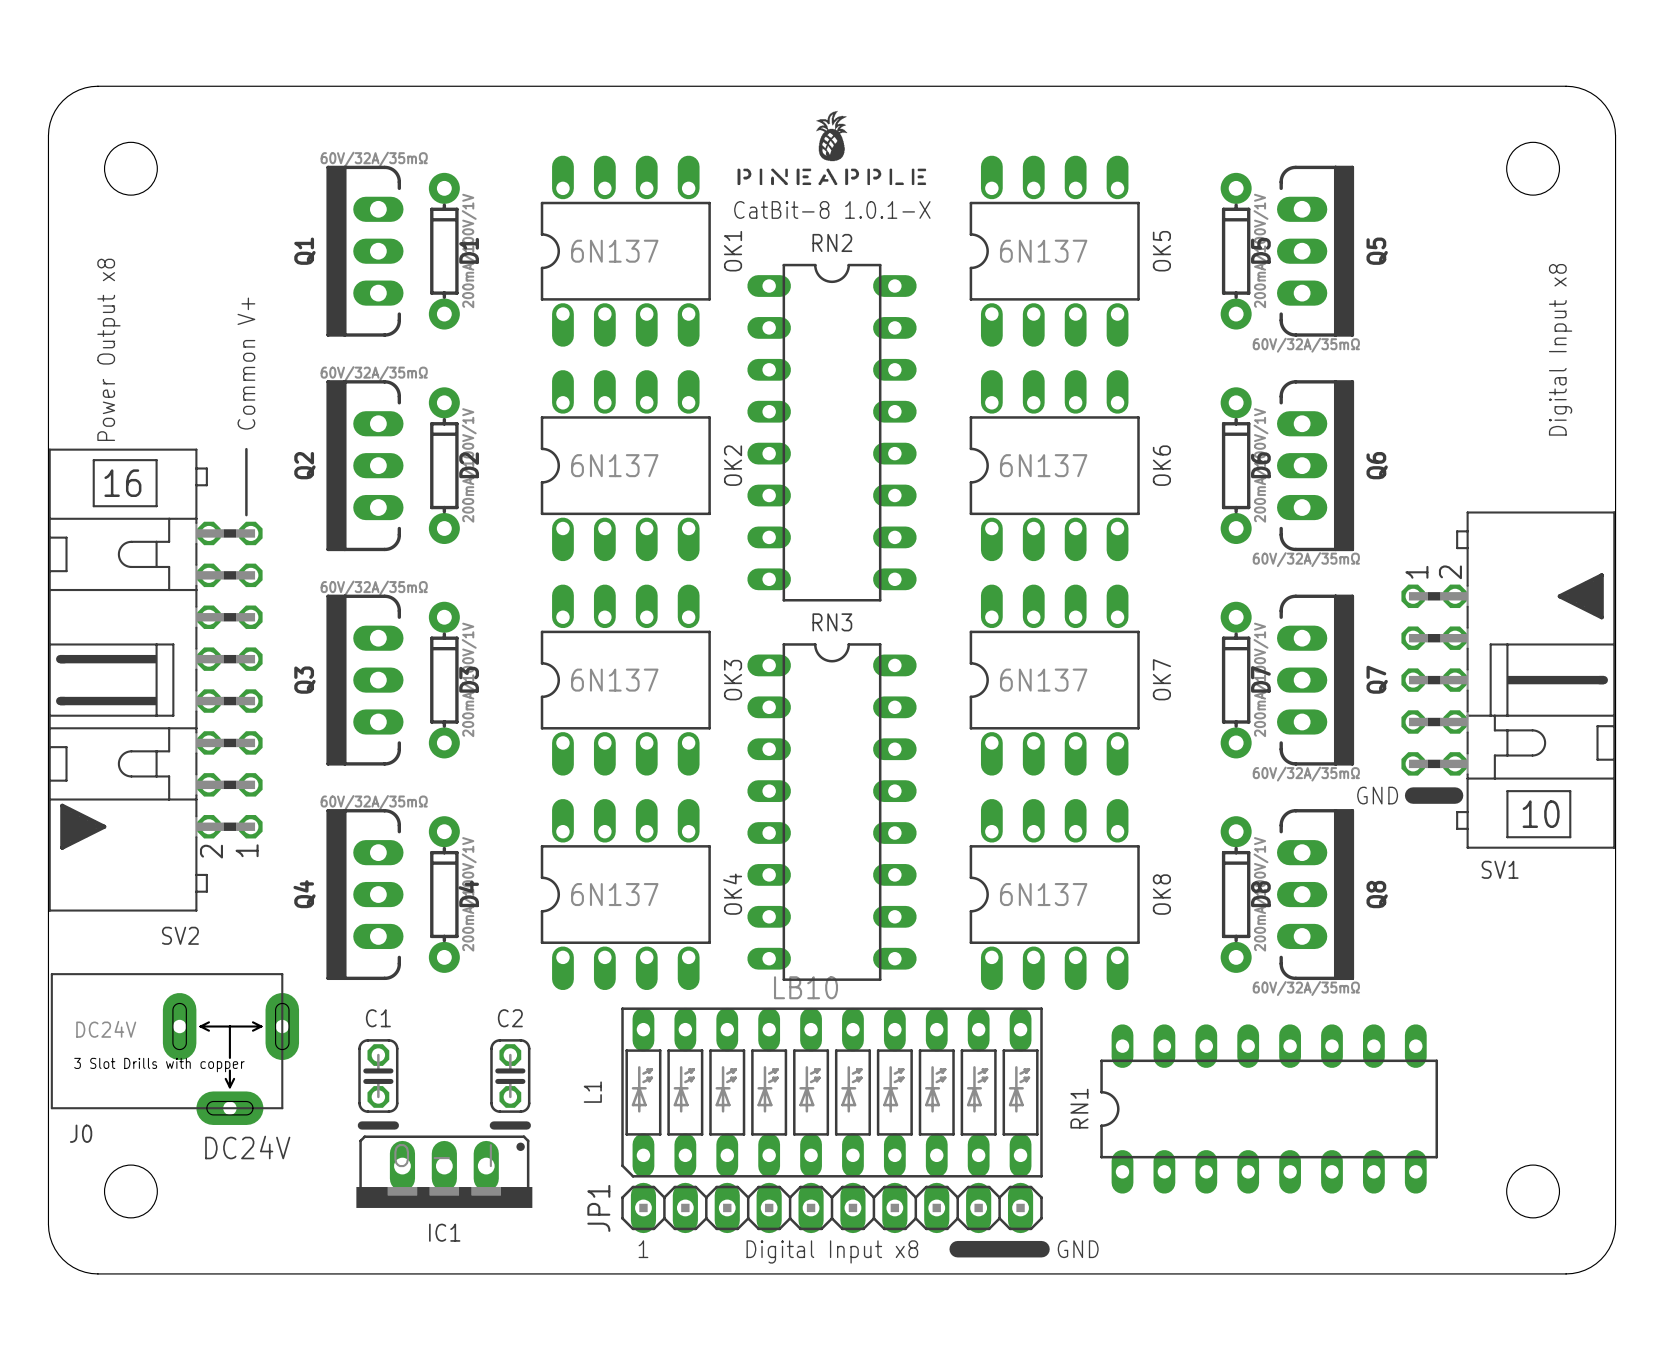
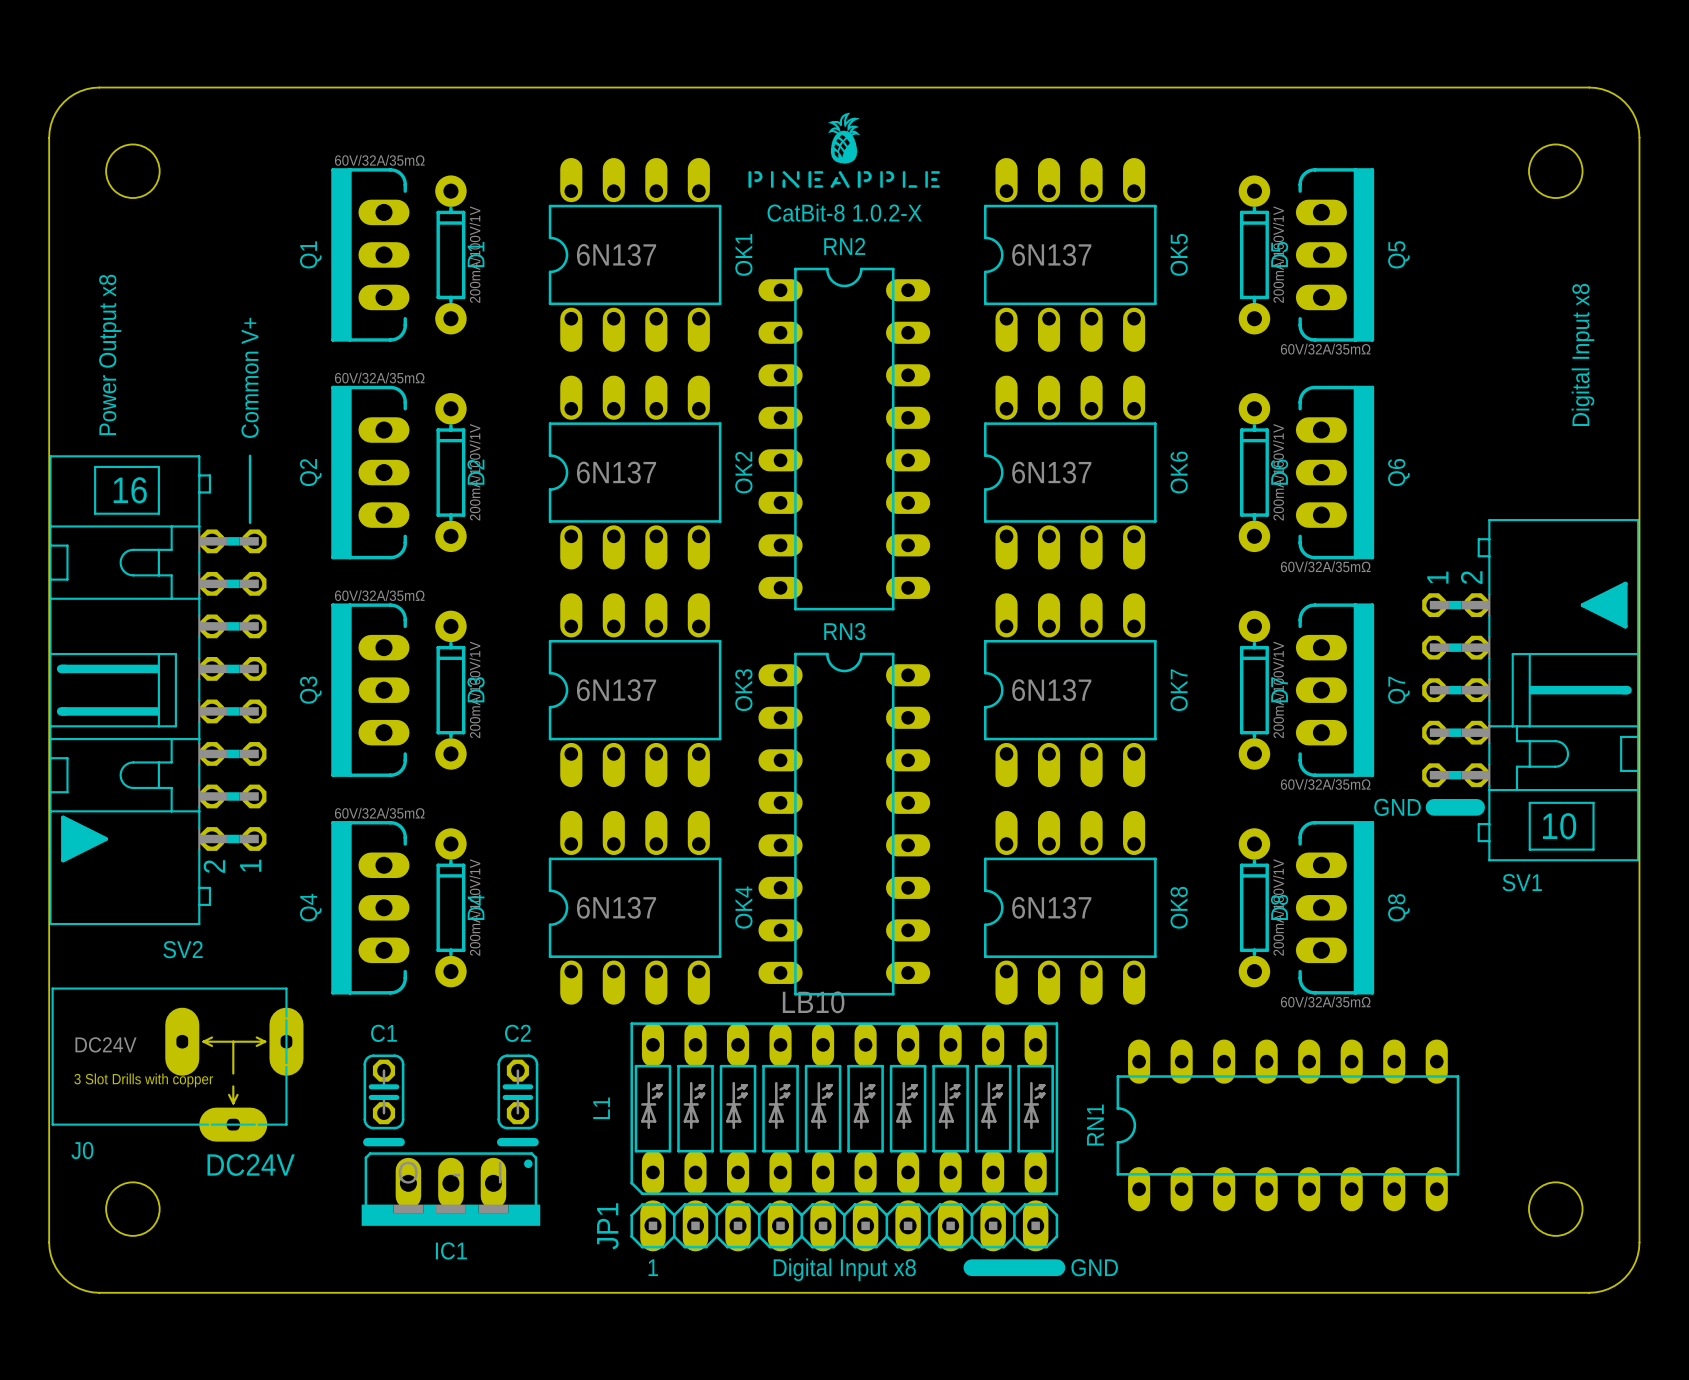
text: CatBit-8 1.0.1-X (832, 209) -> CatBit-8 1.0.2-X (844, 212)

